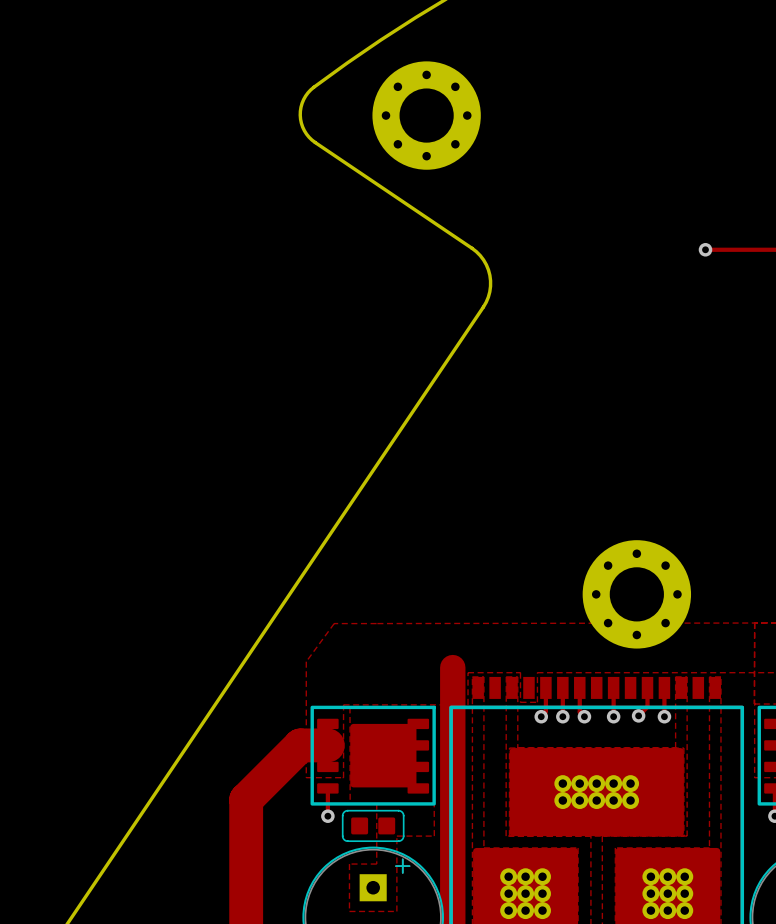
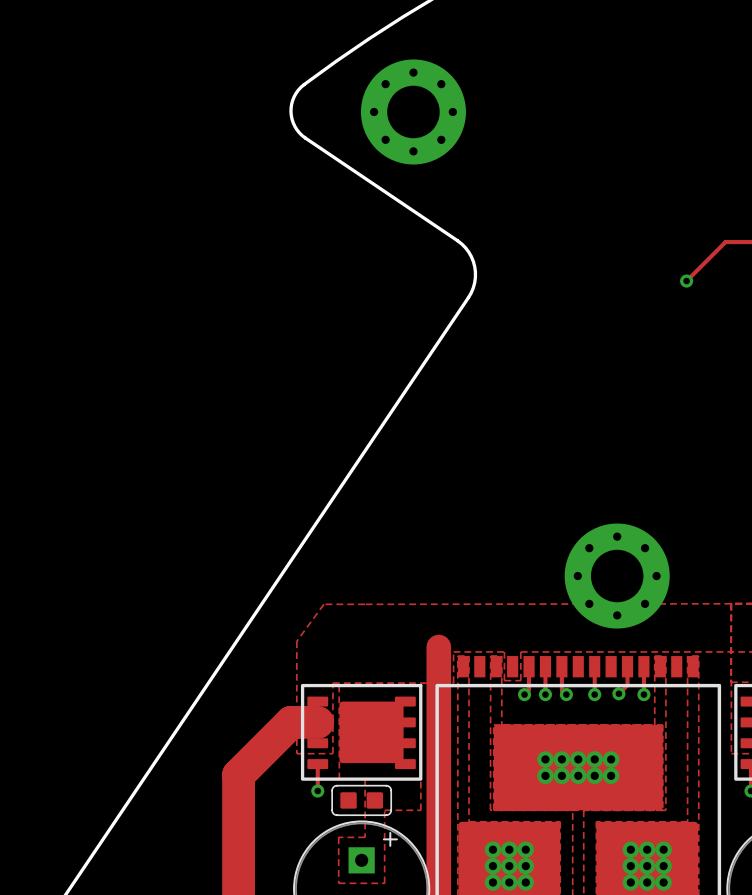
track: (705, 249) (748, 249) -> (686, 281) (725, 242)
via: (705, 249) -> none
via: none -> (686, 281)

